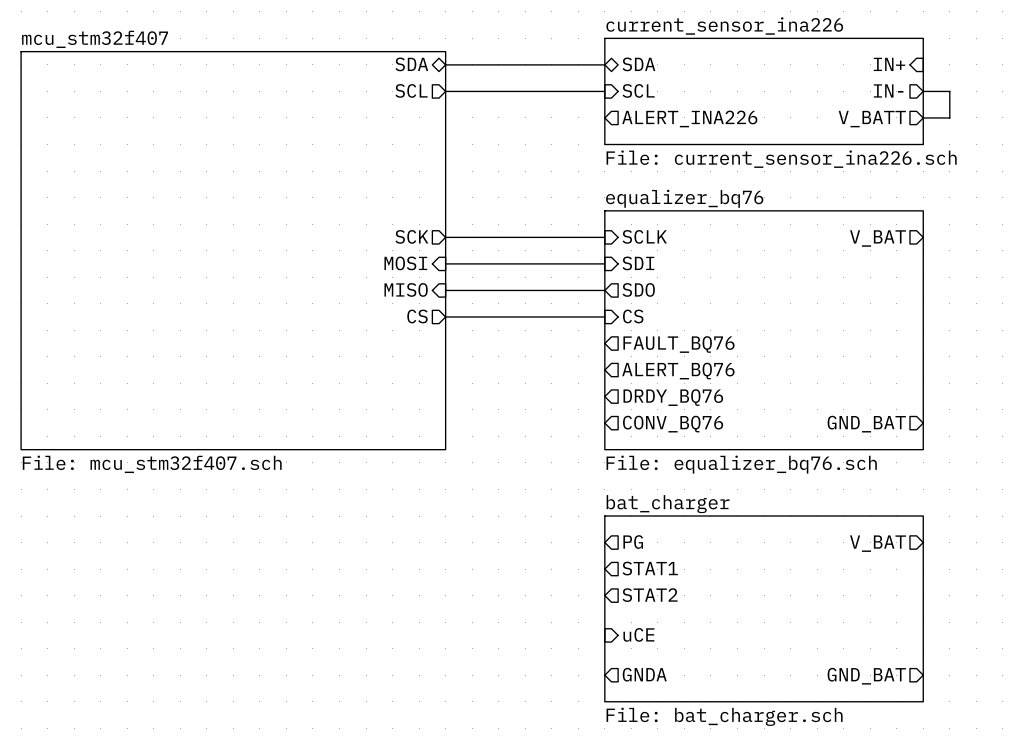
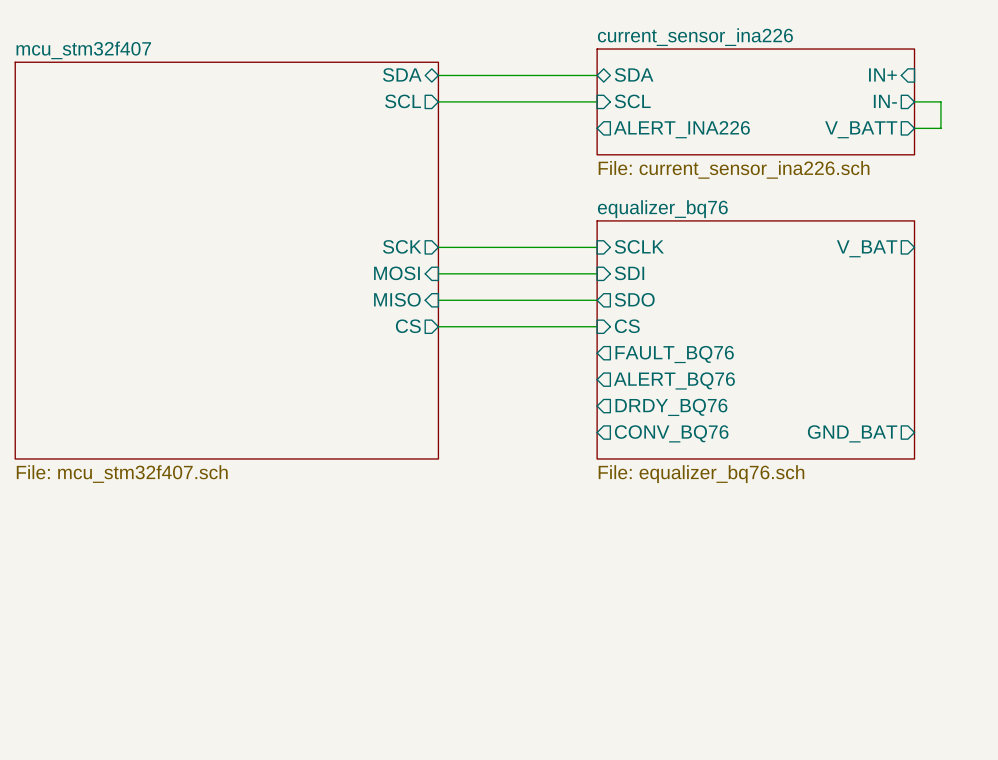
sheet pin: PG (633, 542) -> none
sheet pin: V_BAT (878, 543) -> none
sheet pin: STAT1 (650, 568) -> none
sheet pin: STAT2 (650, 595) -> none
sheet bat_charger: File: bat_charger.sch (764, 608) -> none
sheet pin: uCE (638, 634) -> none
sheet pin: GNDA (644, 674) -> none
sheet pin: GND_BAT (866, 676) -> none

